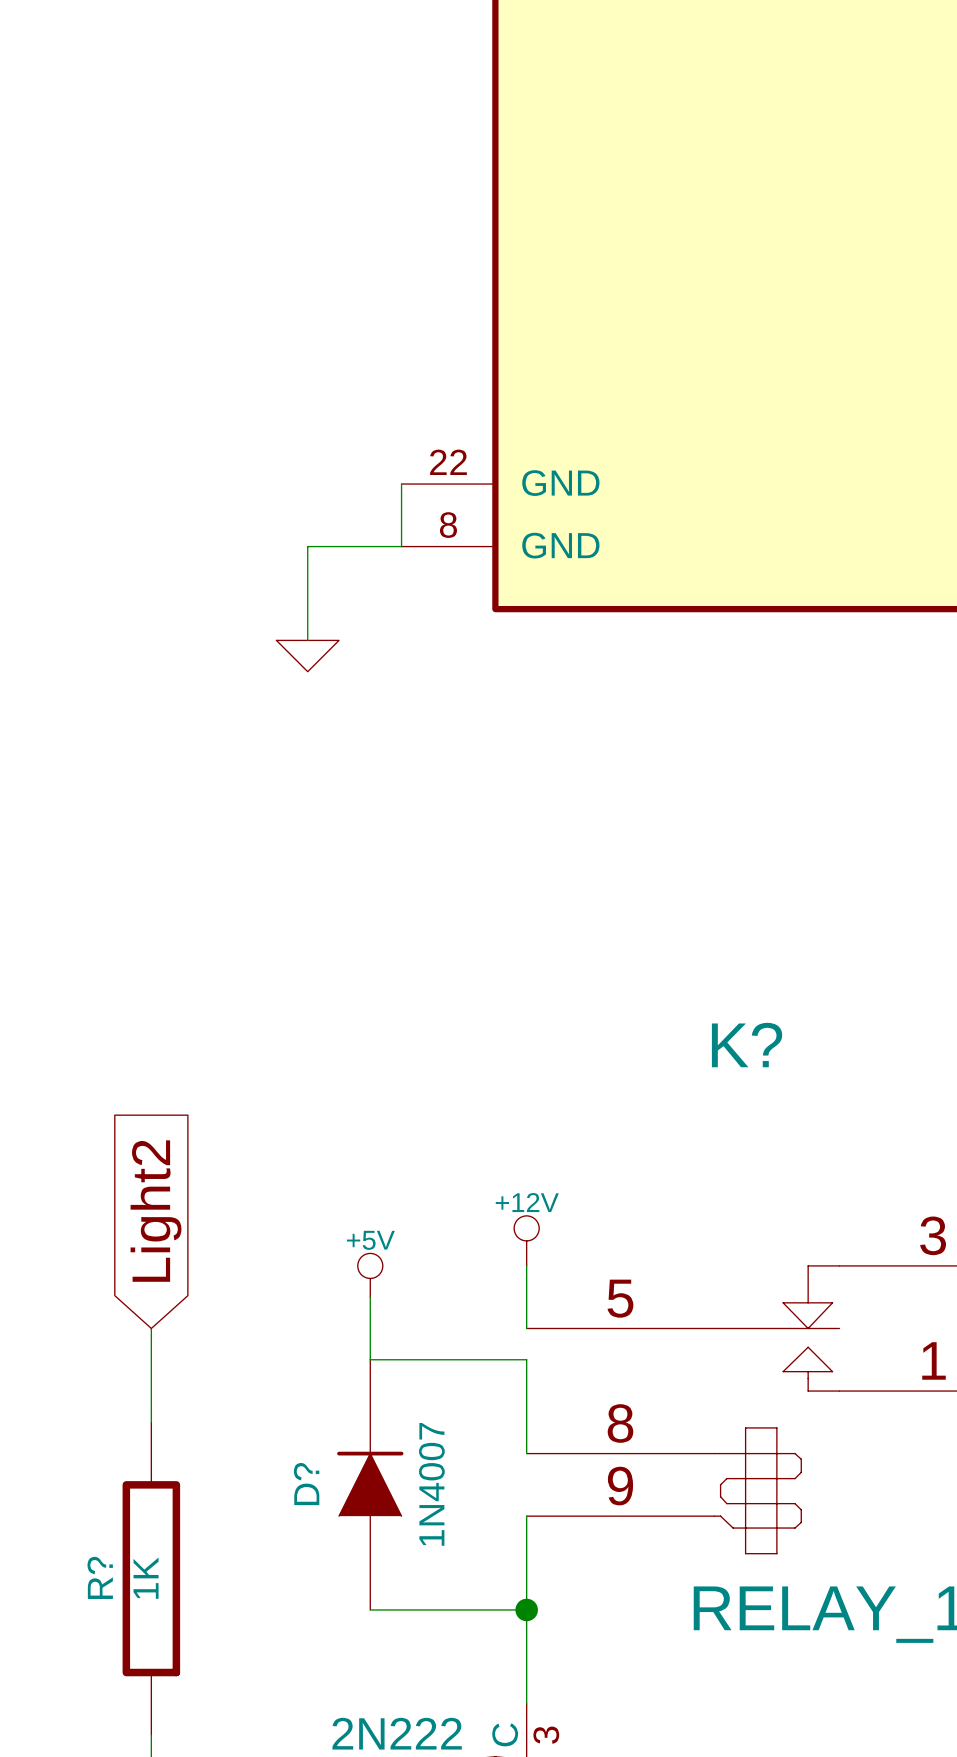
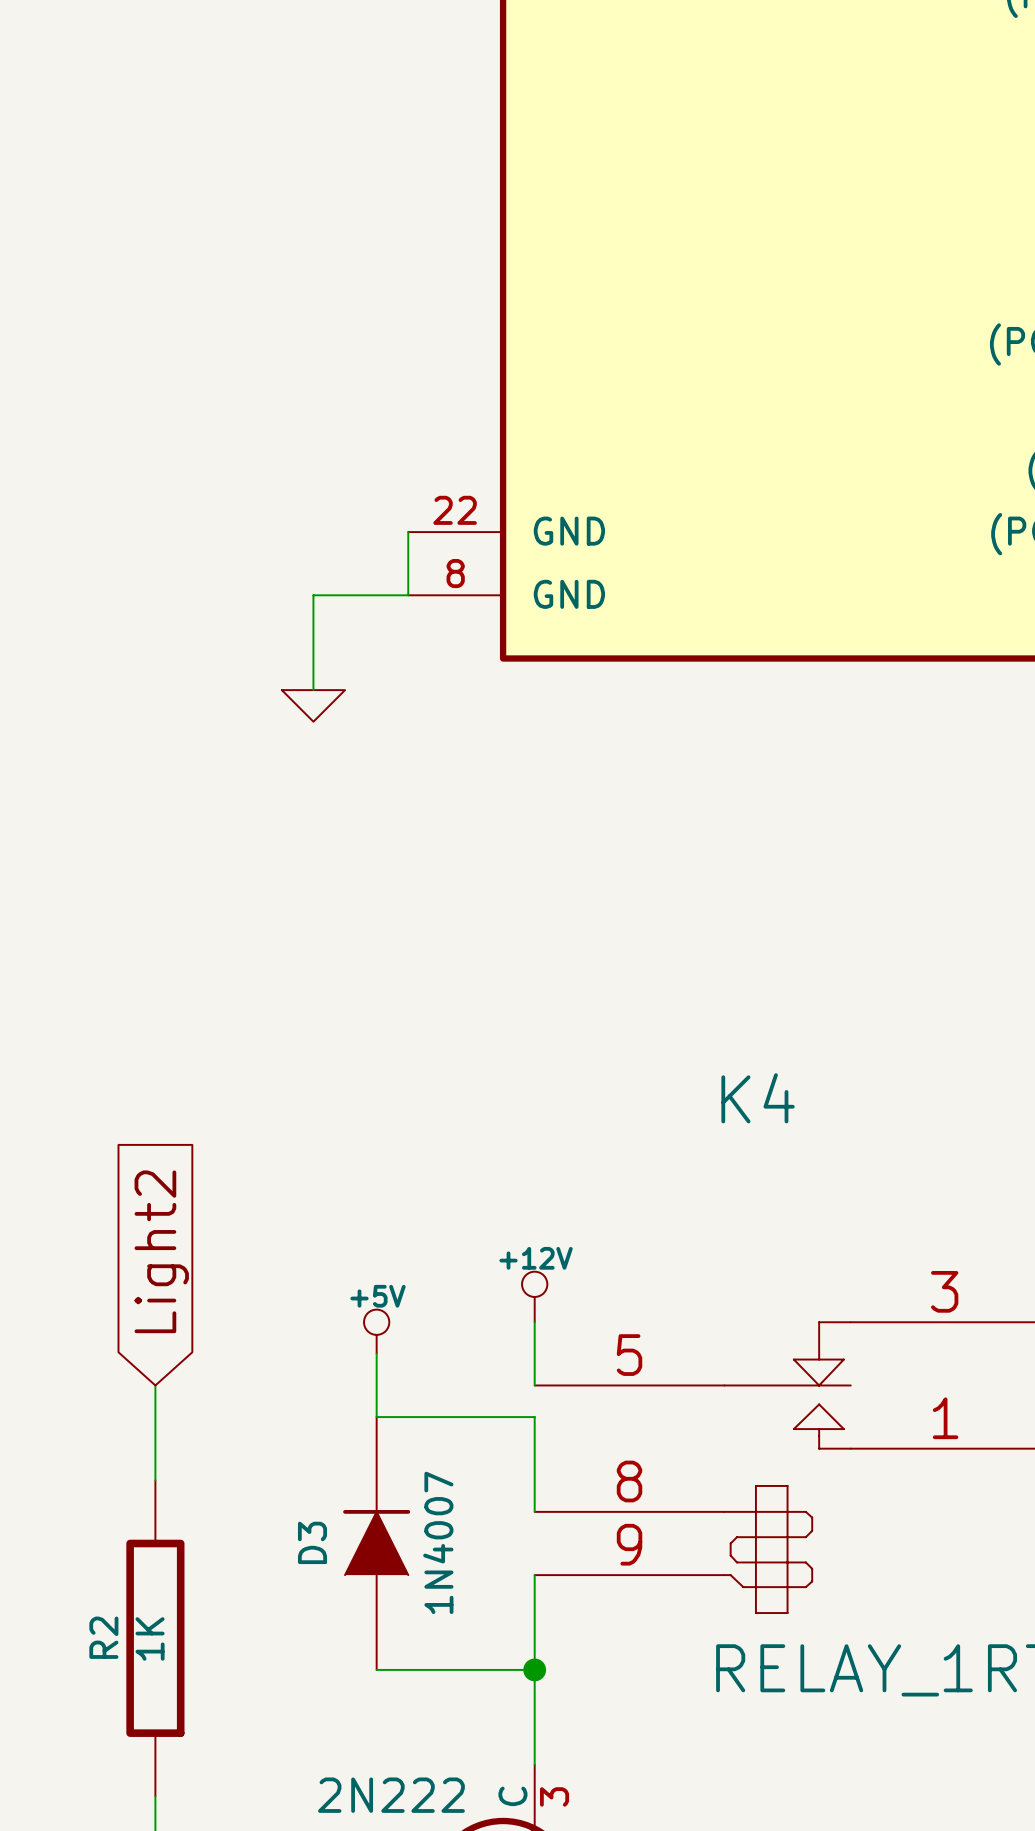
K? name: K? (747, 1045) -> K4 (758, 1098)
D? name: D? (306, 1484) -> D3 (312, 1542)
R? name: R? (100, 1577) -> R2 (103, 1637)

